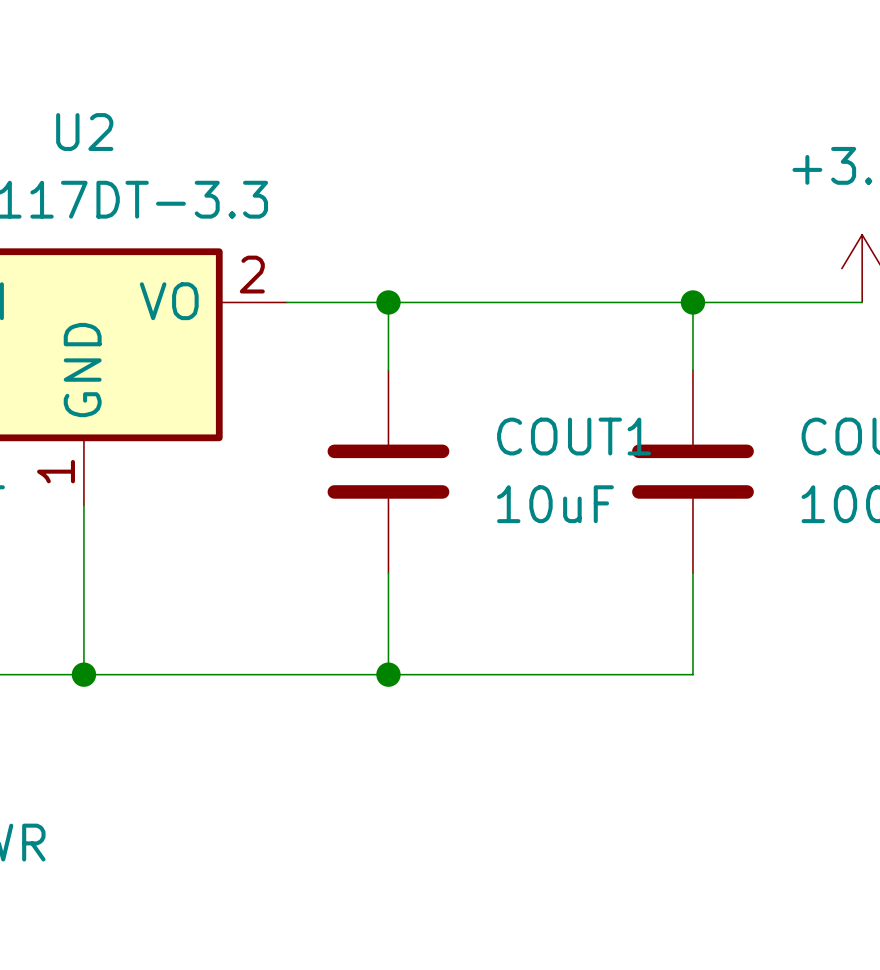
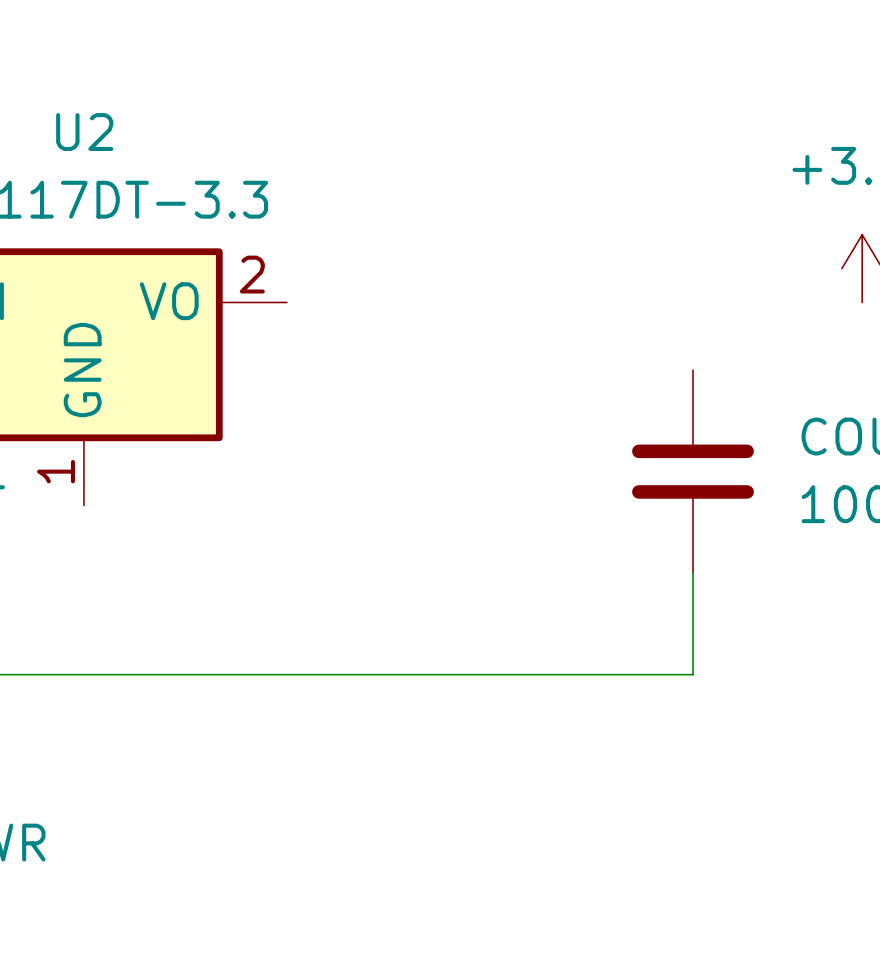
wire: (286, 302) (862, 302) -> none
wire: (388, 302) (388, 370) -> none
junction: (388, 302) -> none
wire: (692, 302) (692, 370) -> none
junction: (692, 302) -> none
COUT1: 10uF (388, 471) -> none
wire: (83, 505) (83, 674) -> none
wire: (388, 573) (388, 674) -> none
junction: (83, 674) -> none
junction: (388, 674) -> none

